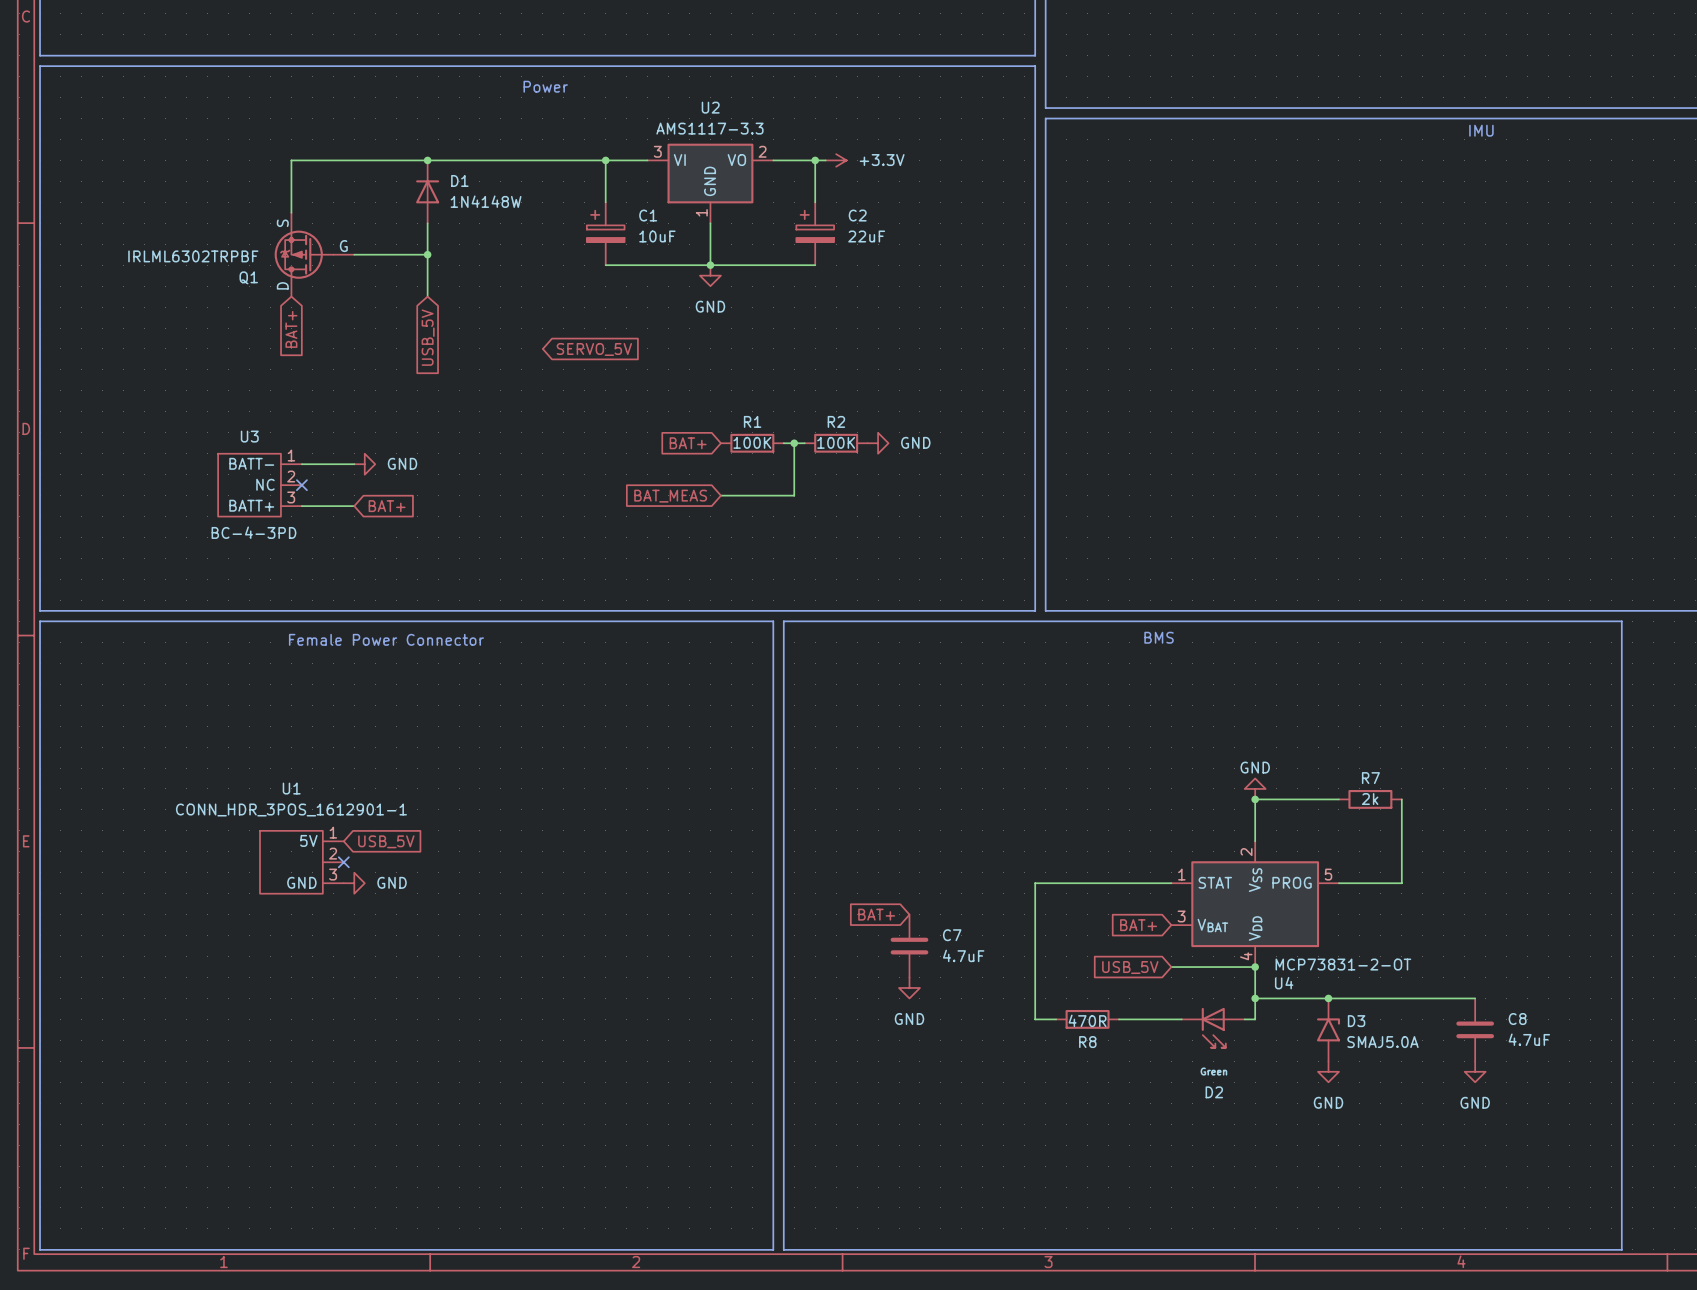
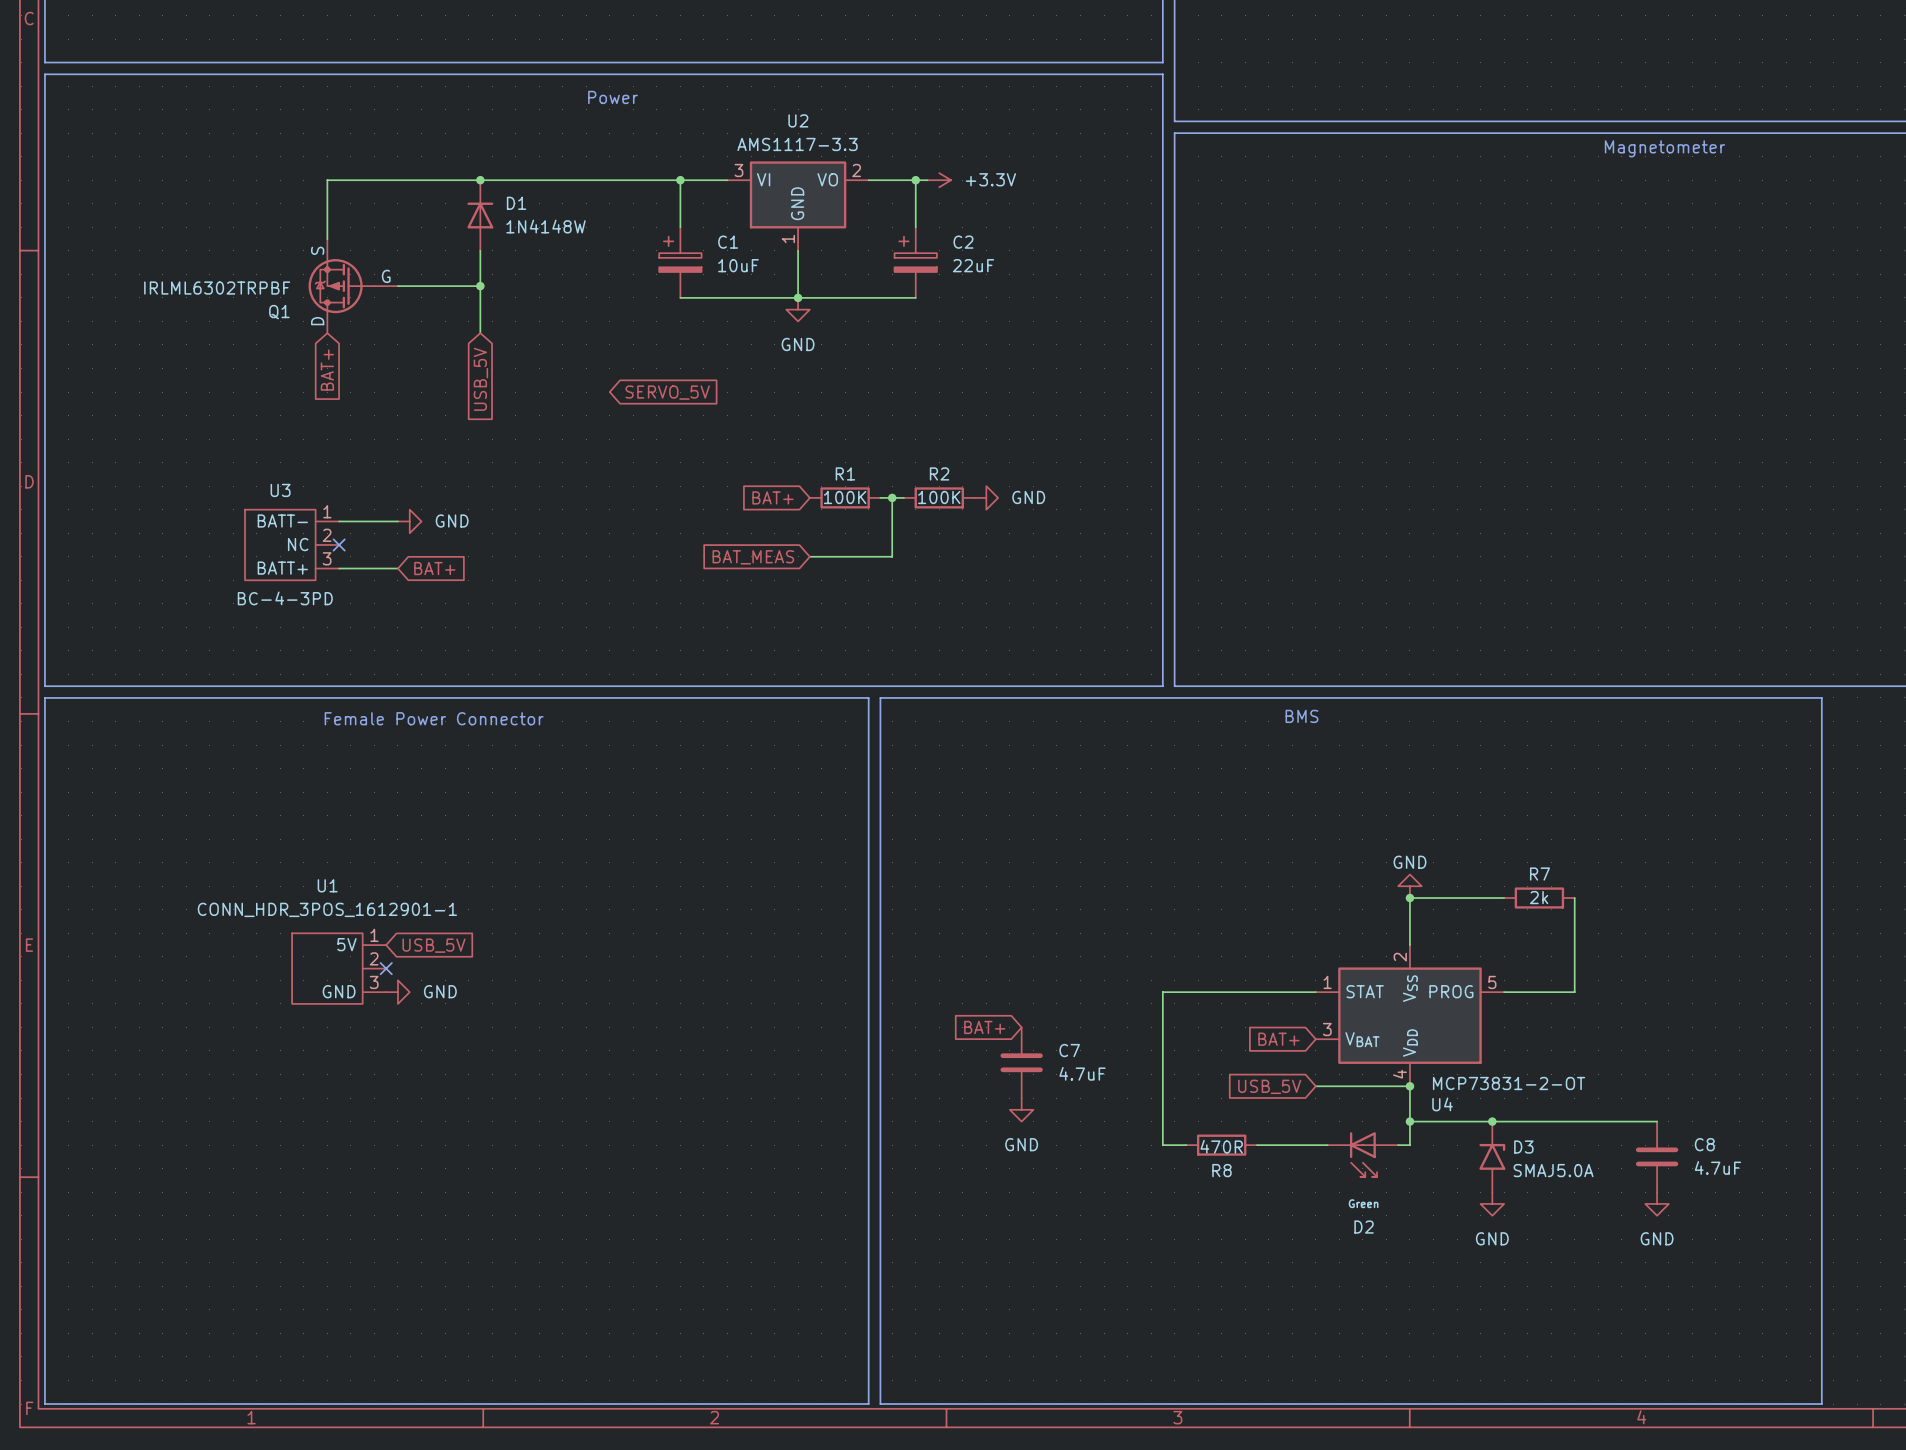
text: IMU (1481, 130) -> Magnetometer (1664, 148)

